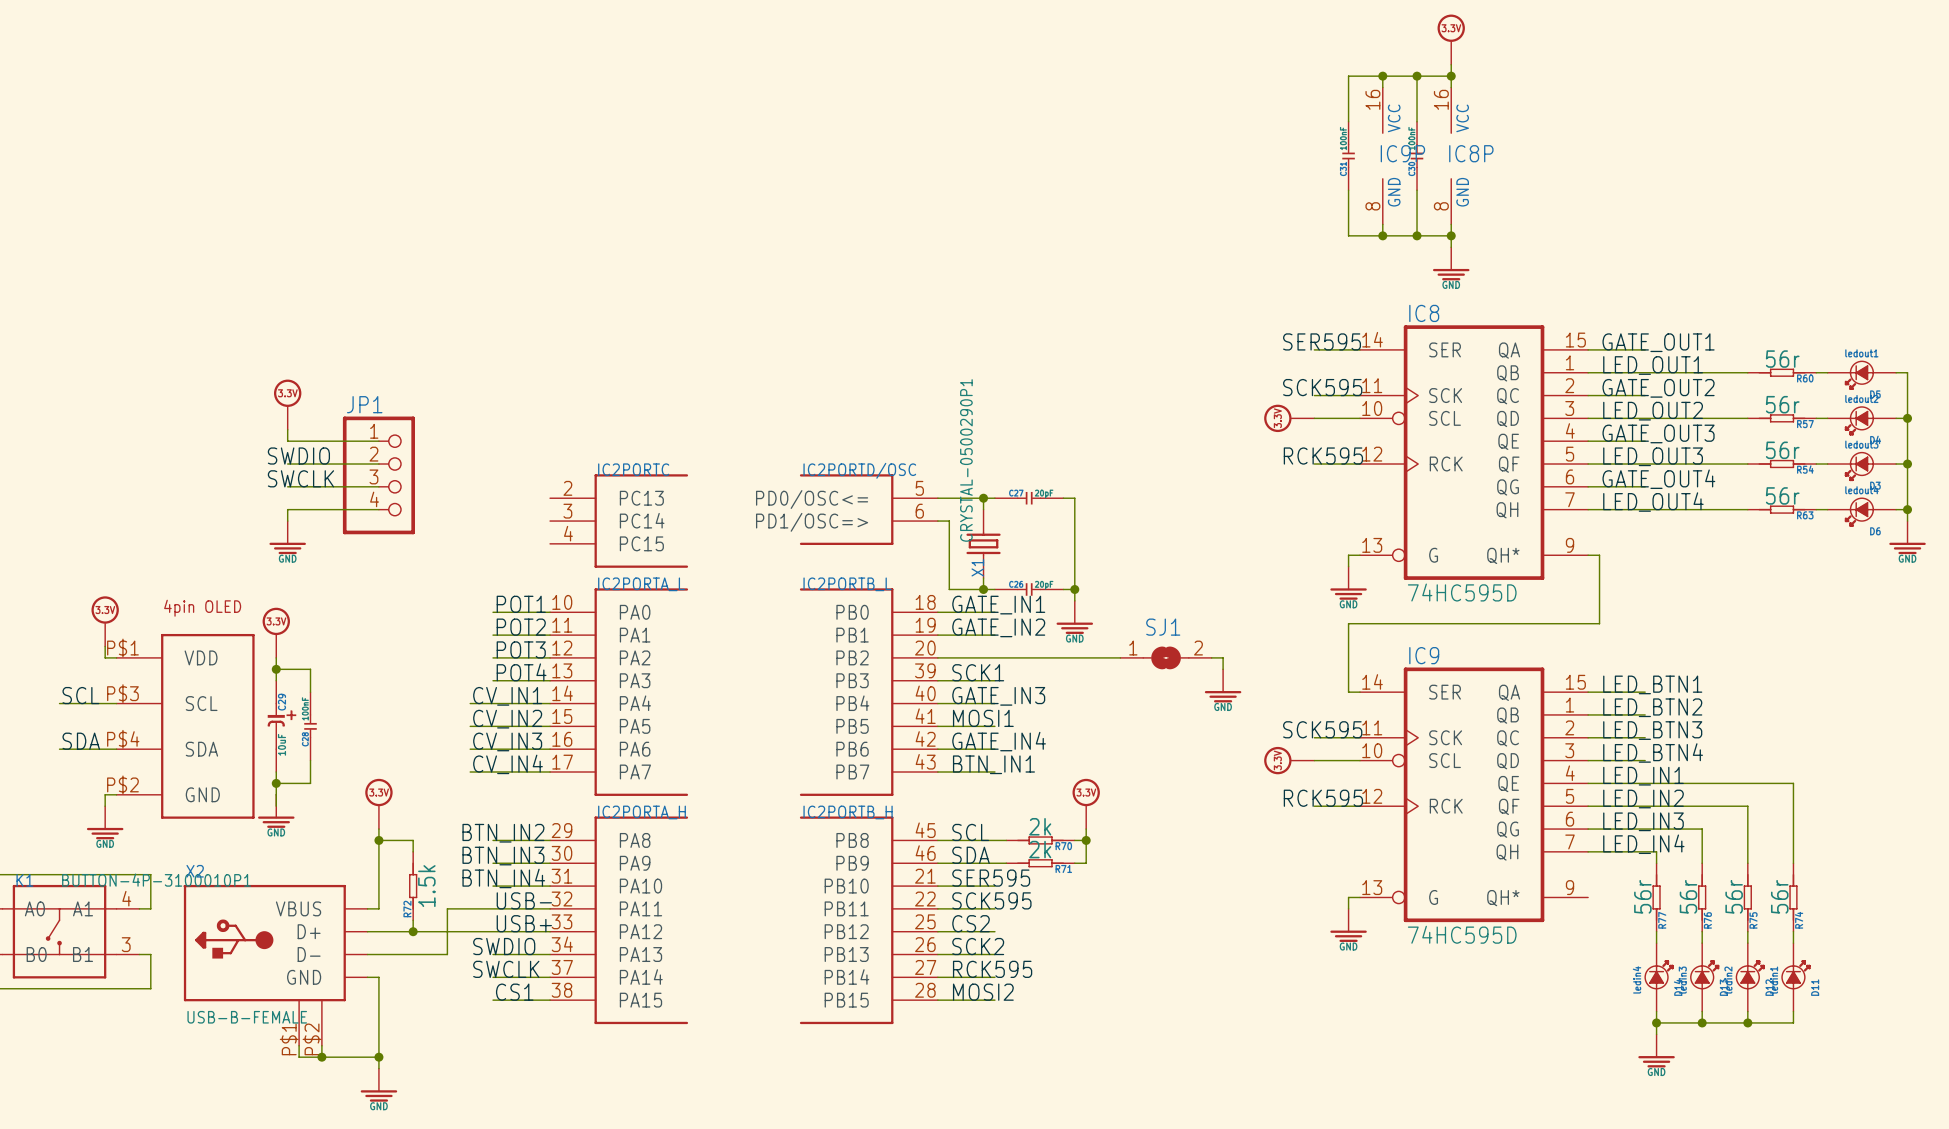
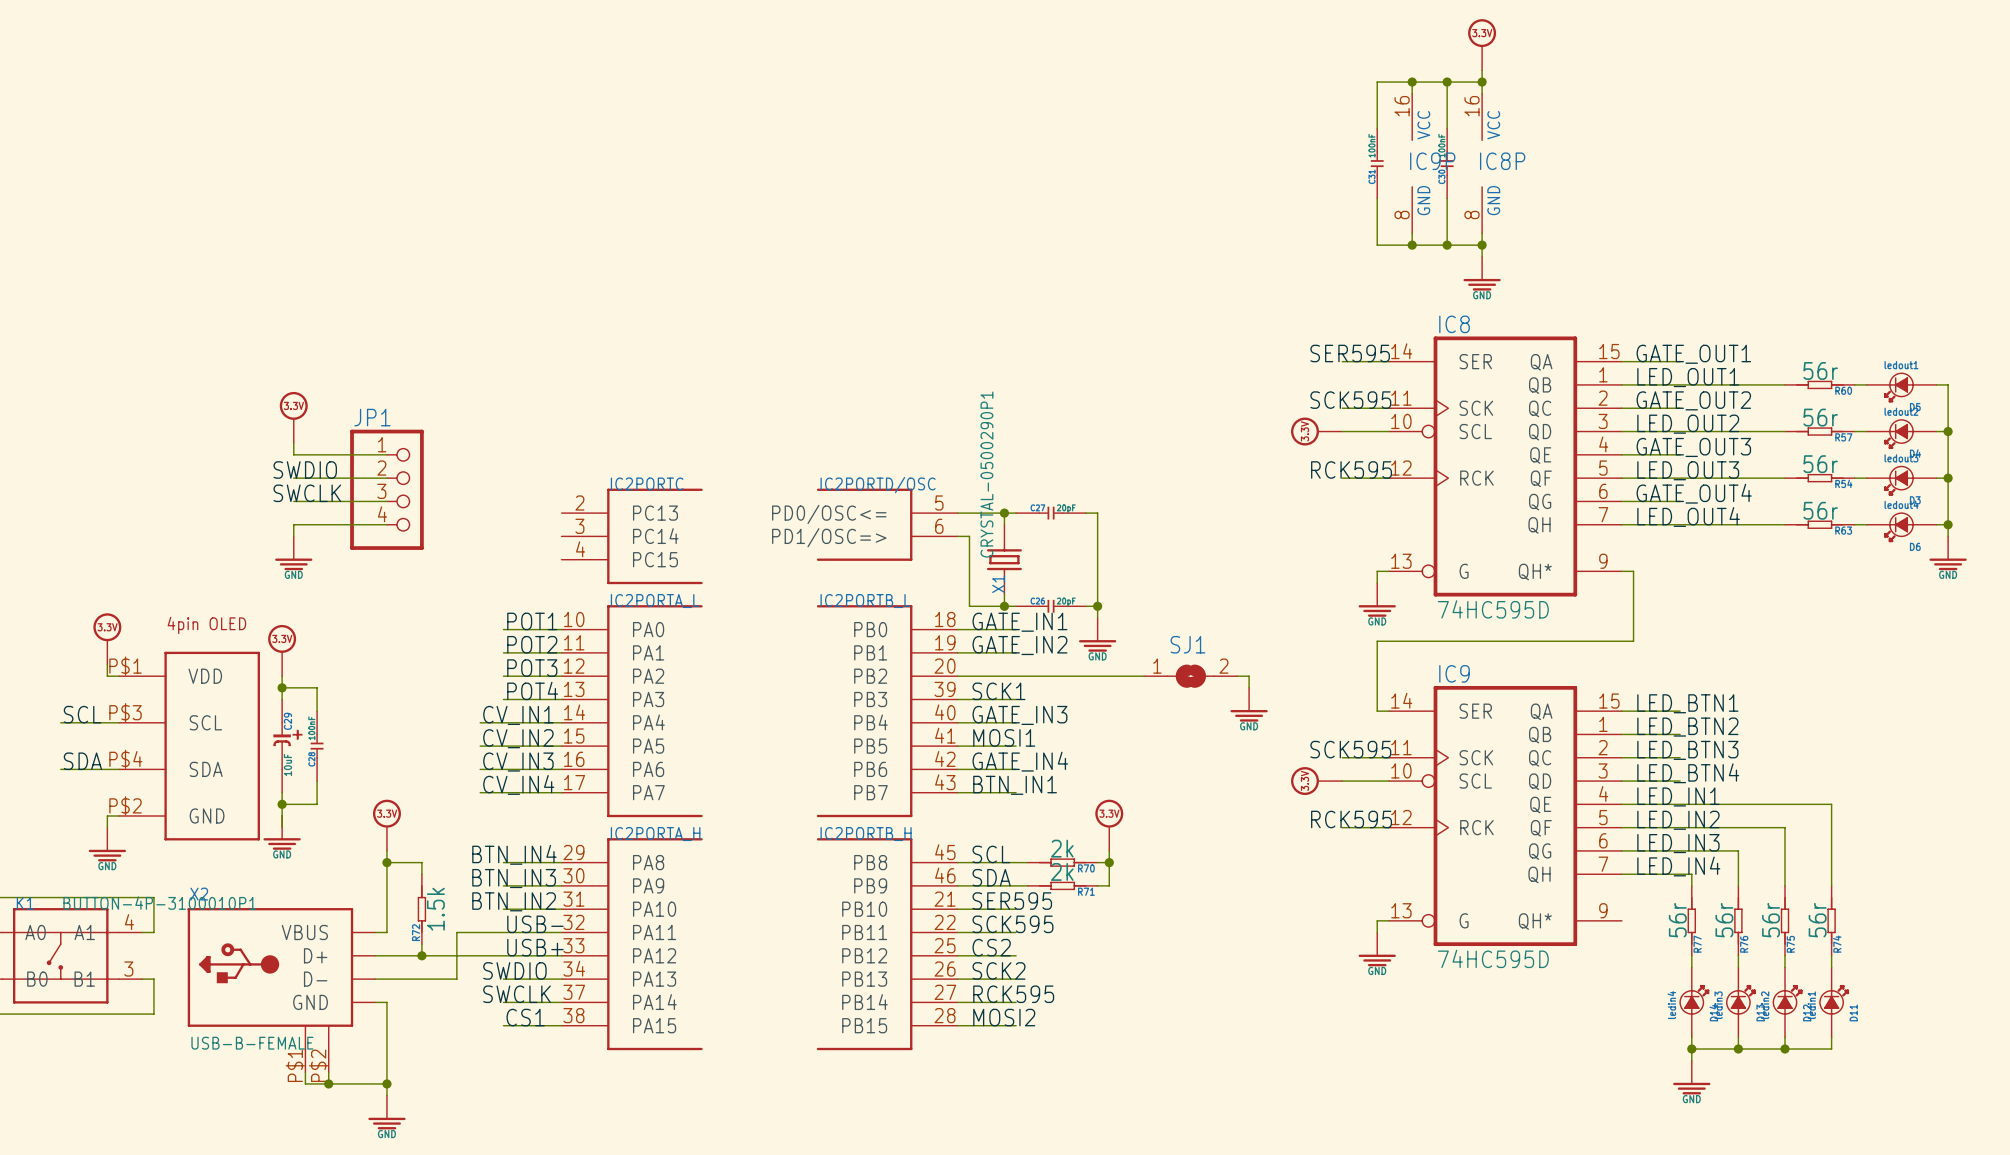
label: BTN_IN2 (503, 833) -> BTN_IN4 (514, 854)
label: BTN_IN4 (503, 878) -> BTN_IN2 (514, 901)

